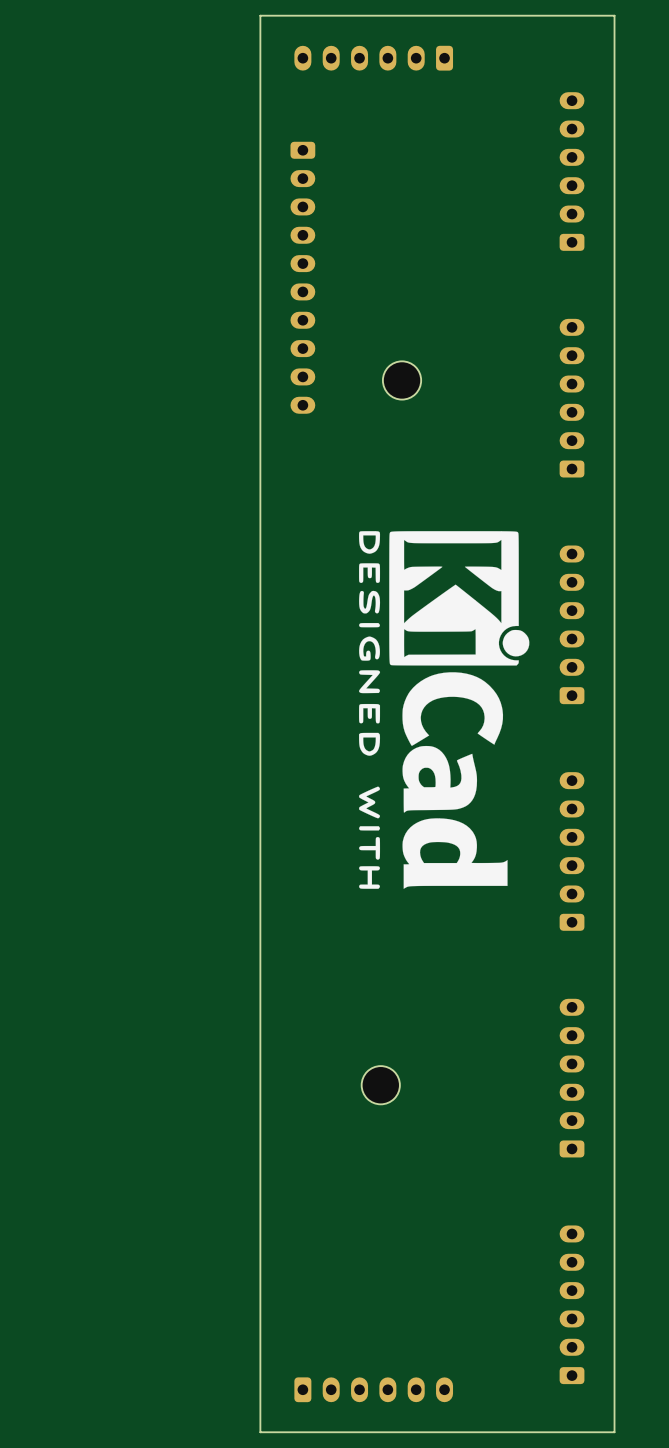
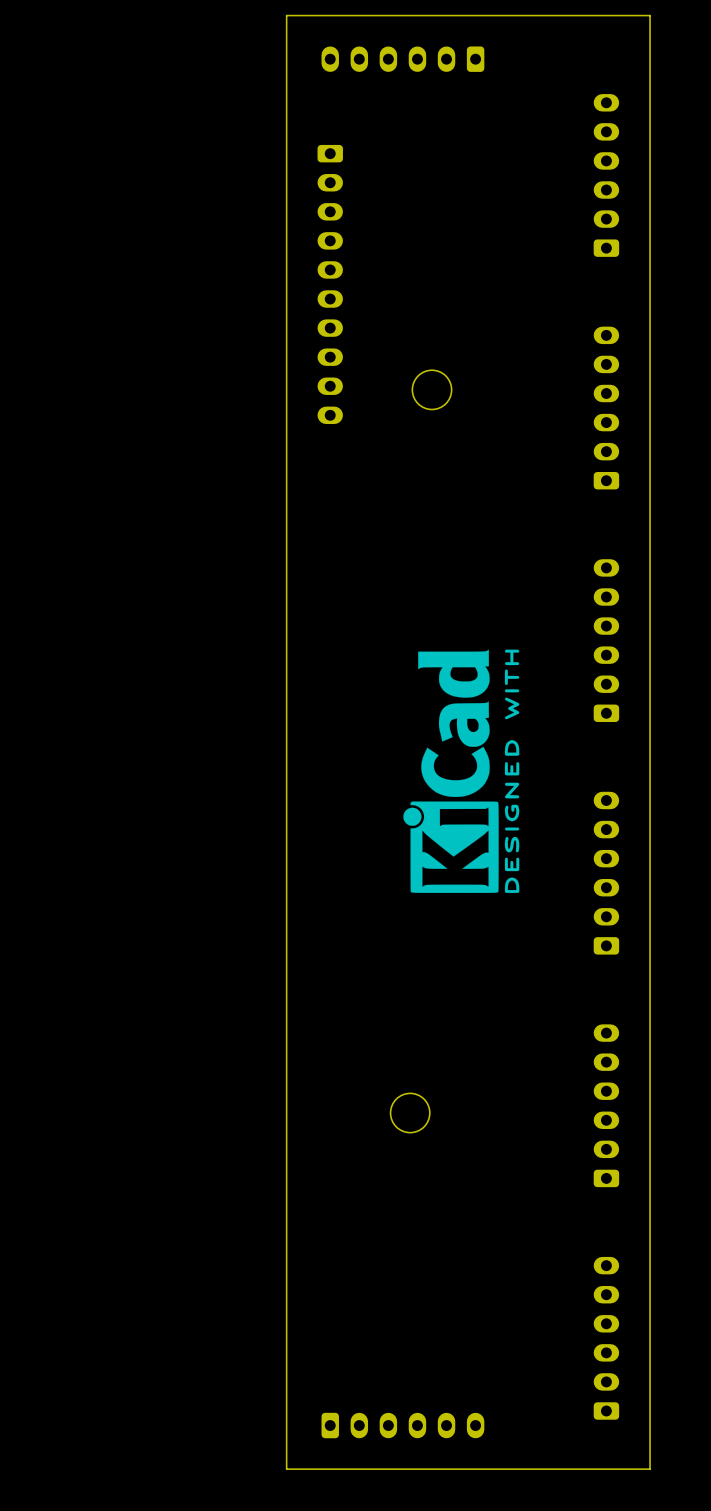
drawing: [359, 531, 530, 889] -> none
drawing: none -> [403, 649, 520, 893]

